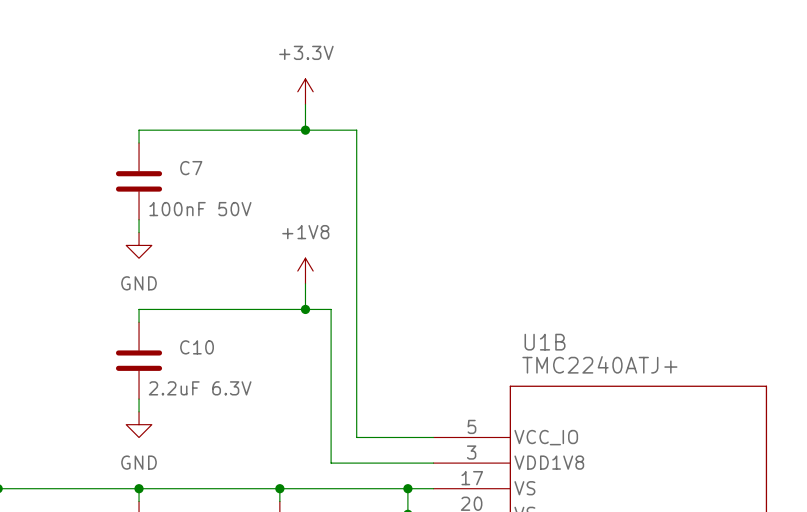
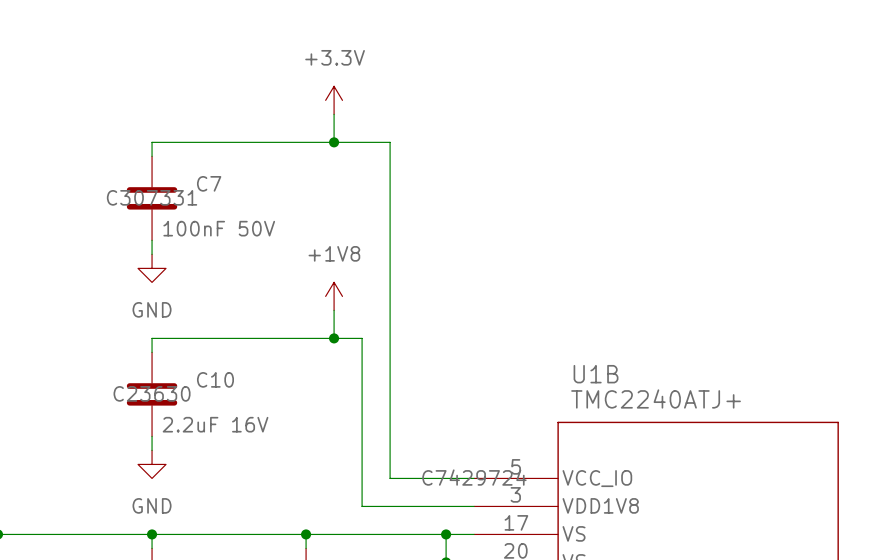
C7 text: none -> C307331 (152, 197)
C10 text: none -> C23630 (152, 393)
C10 value: 2.2uF 6.3V (200, 388) -> 2.2uF 16V (215, 424)
U1B text: none -> C7429724 (474, 477)

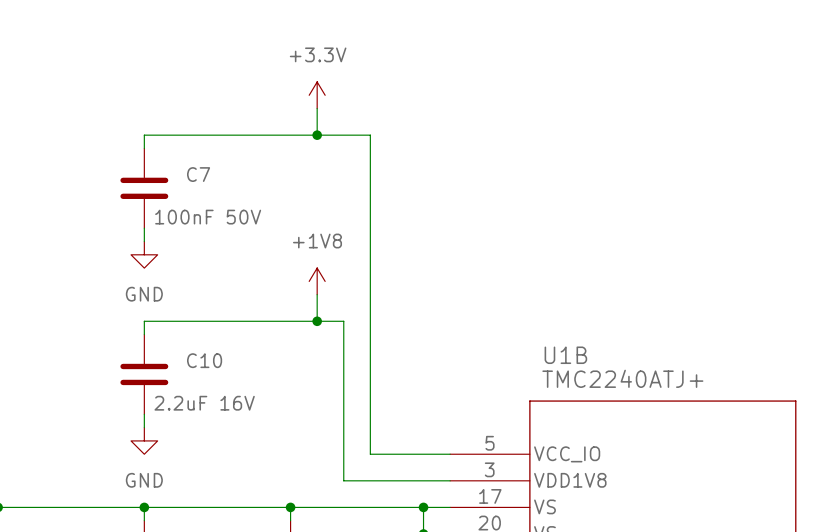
C7 text: C307331 (152, 197) -> none
C10 text: C23630 (152, 393) -> none
U1B text: C7429724 (474, 477) -> none

